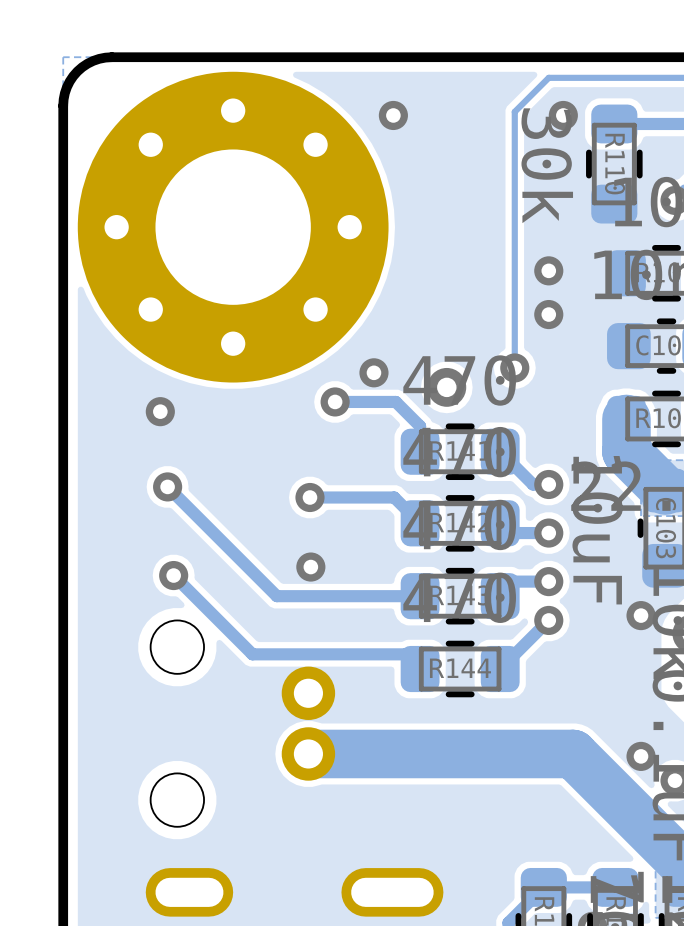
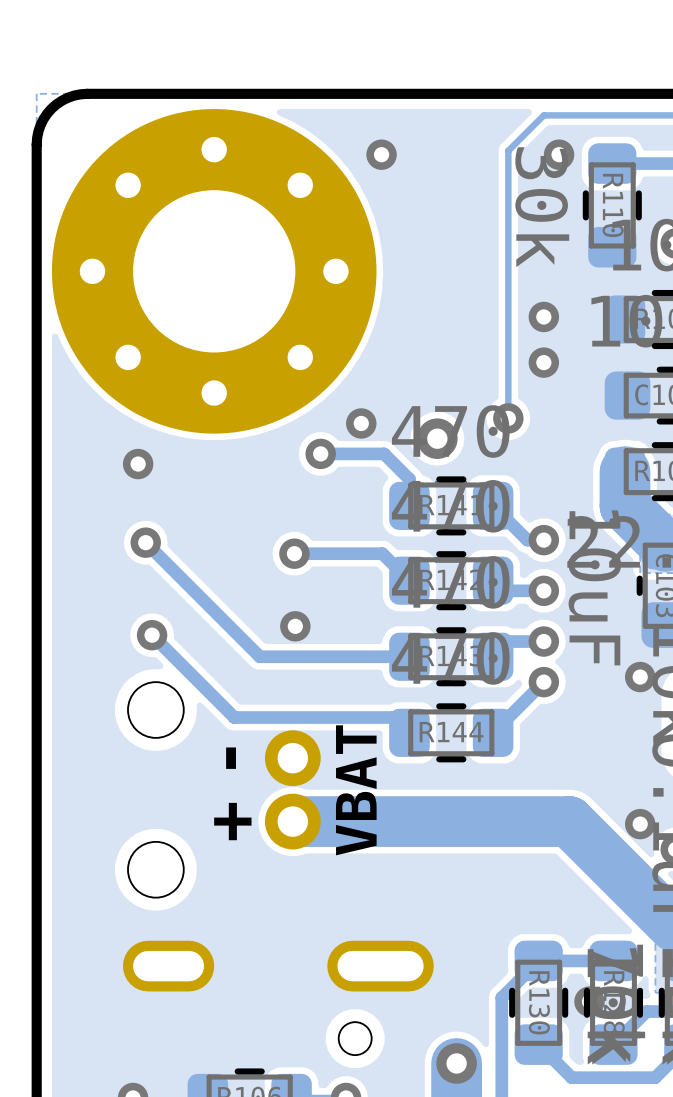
text: none -> - (231, 758)
text: none -> VBAT (356, 790)
text: none -> + (232, 821)

